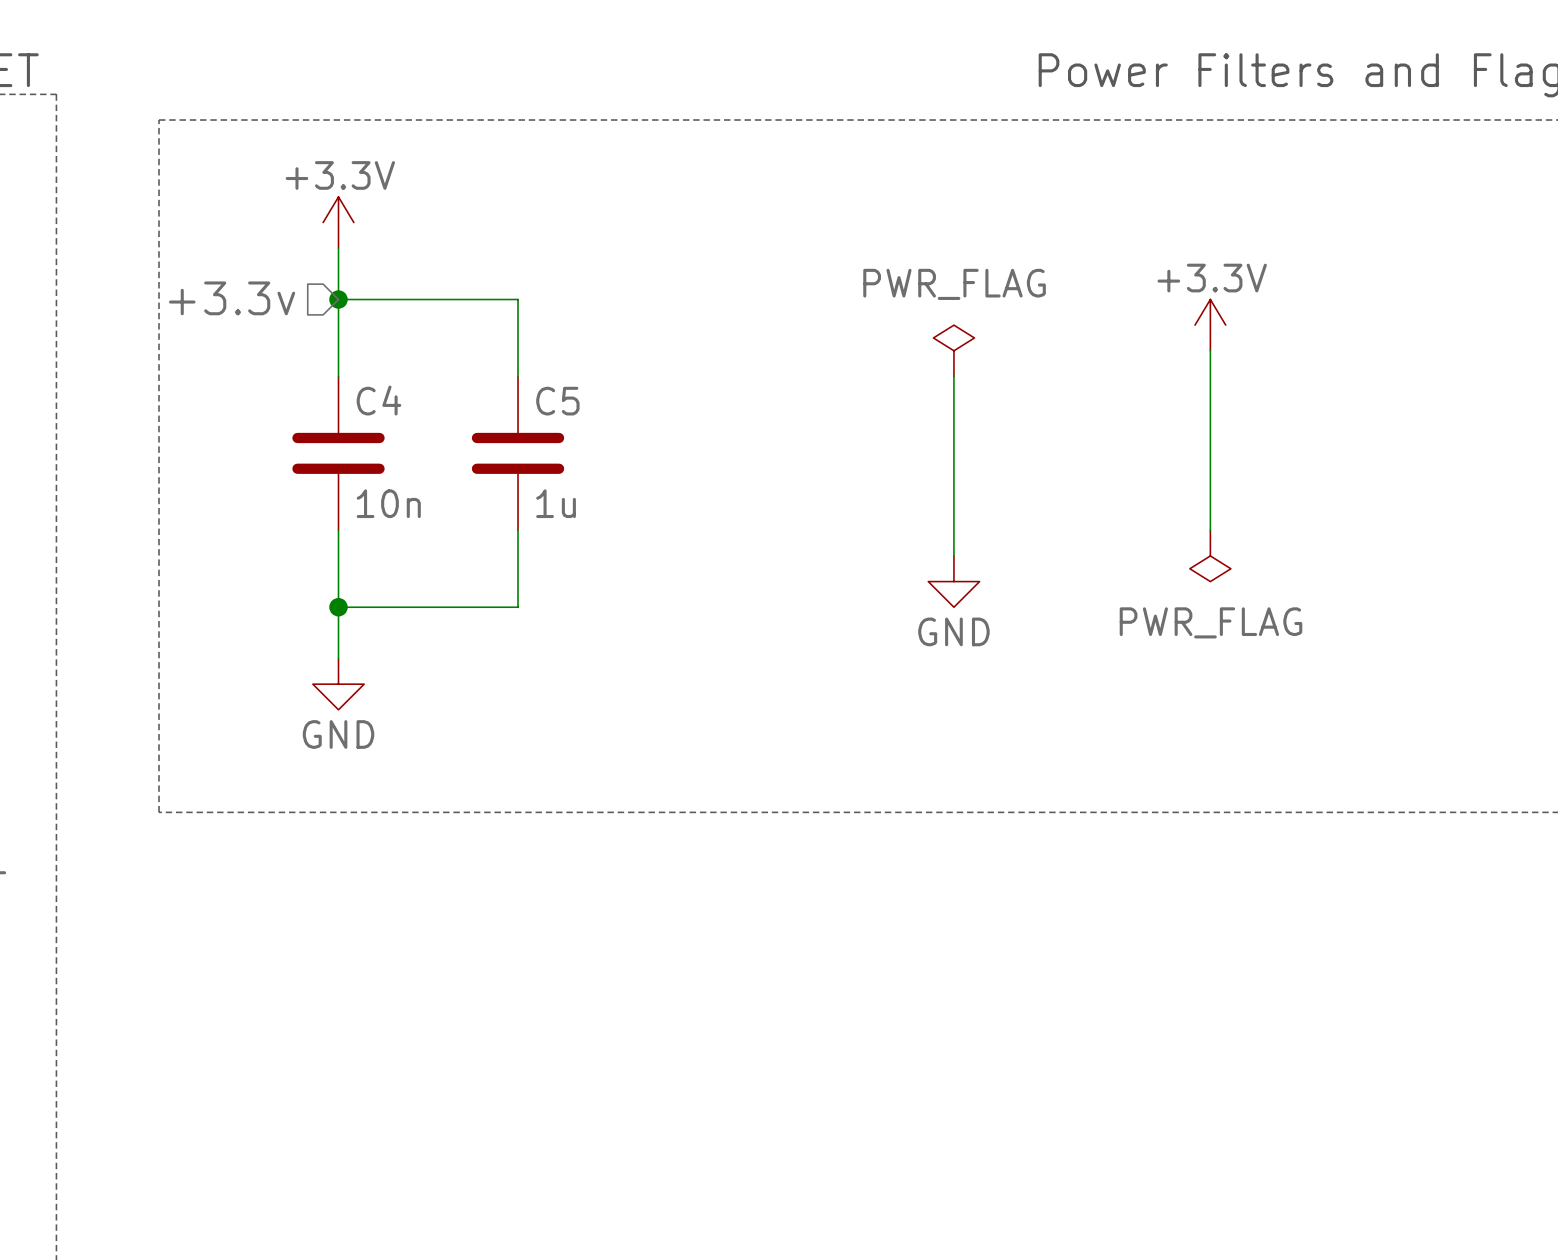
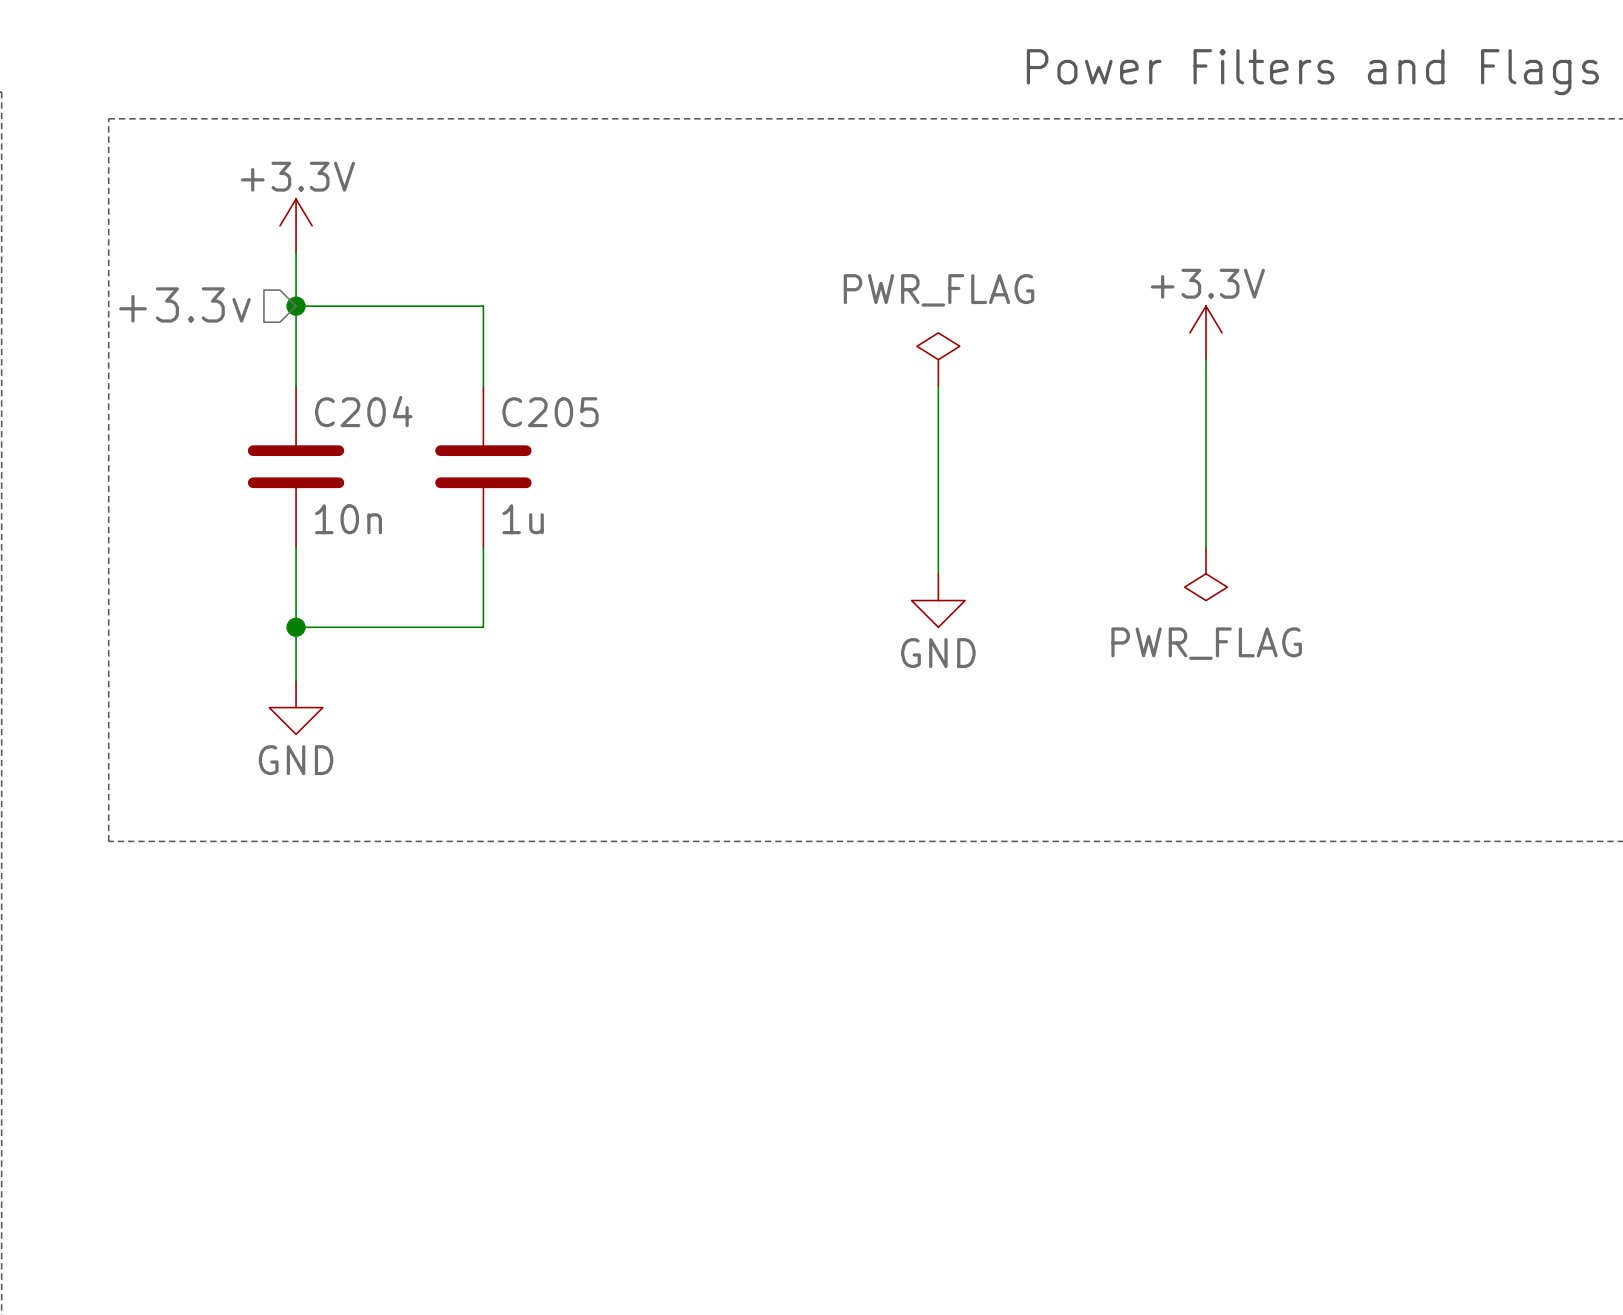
C4 name: C4 (378, 400) -> C204 (363, 411)
C5 name: C5 (557, 401) -> C205 (550, 412)

